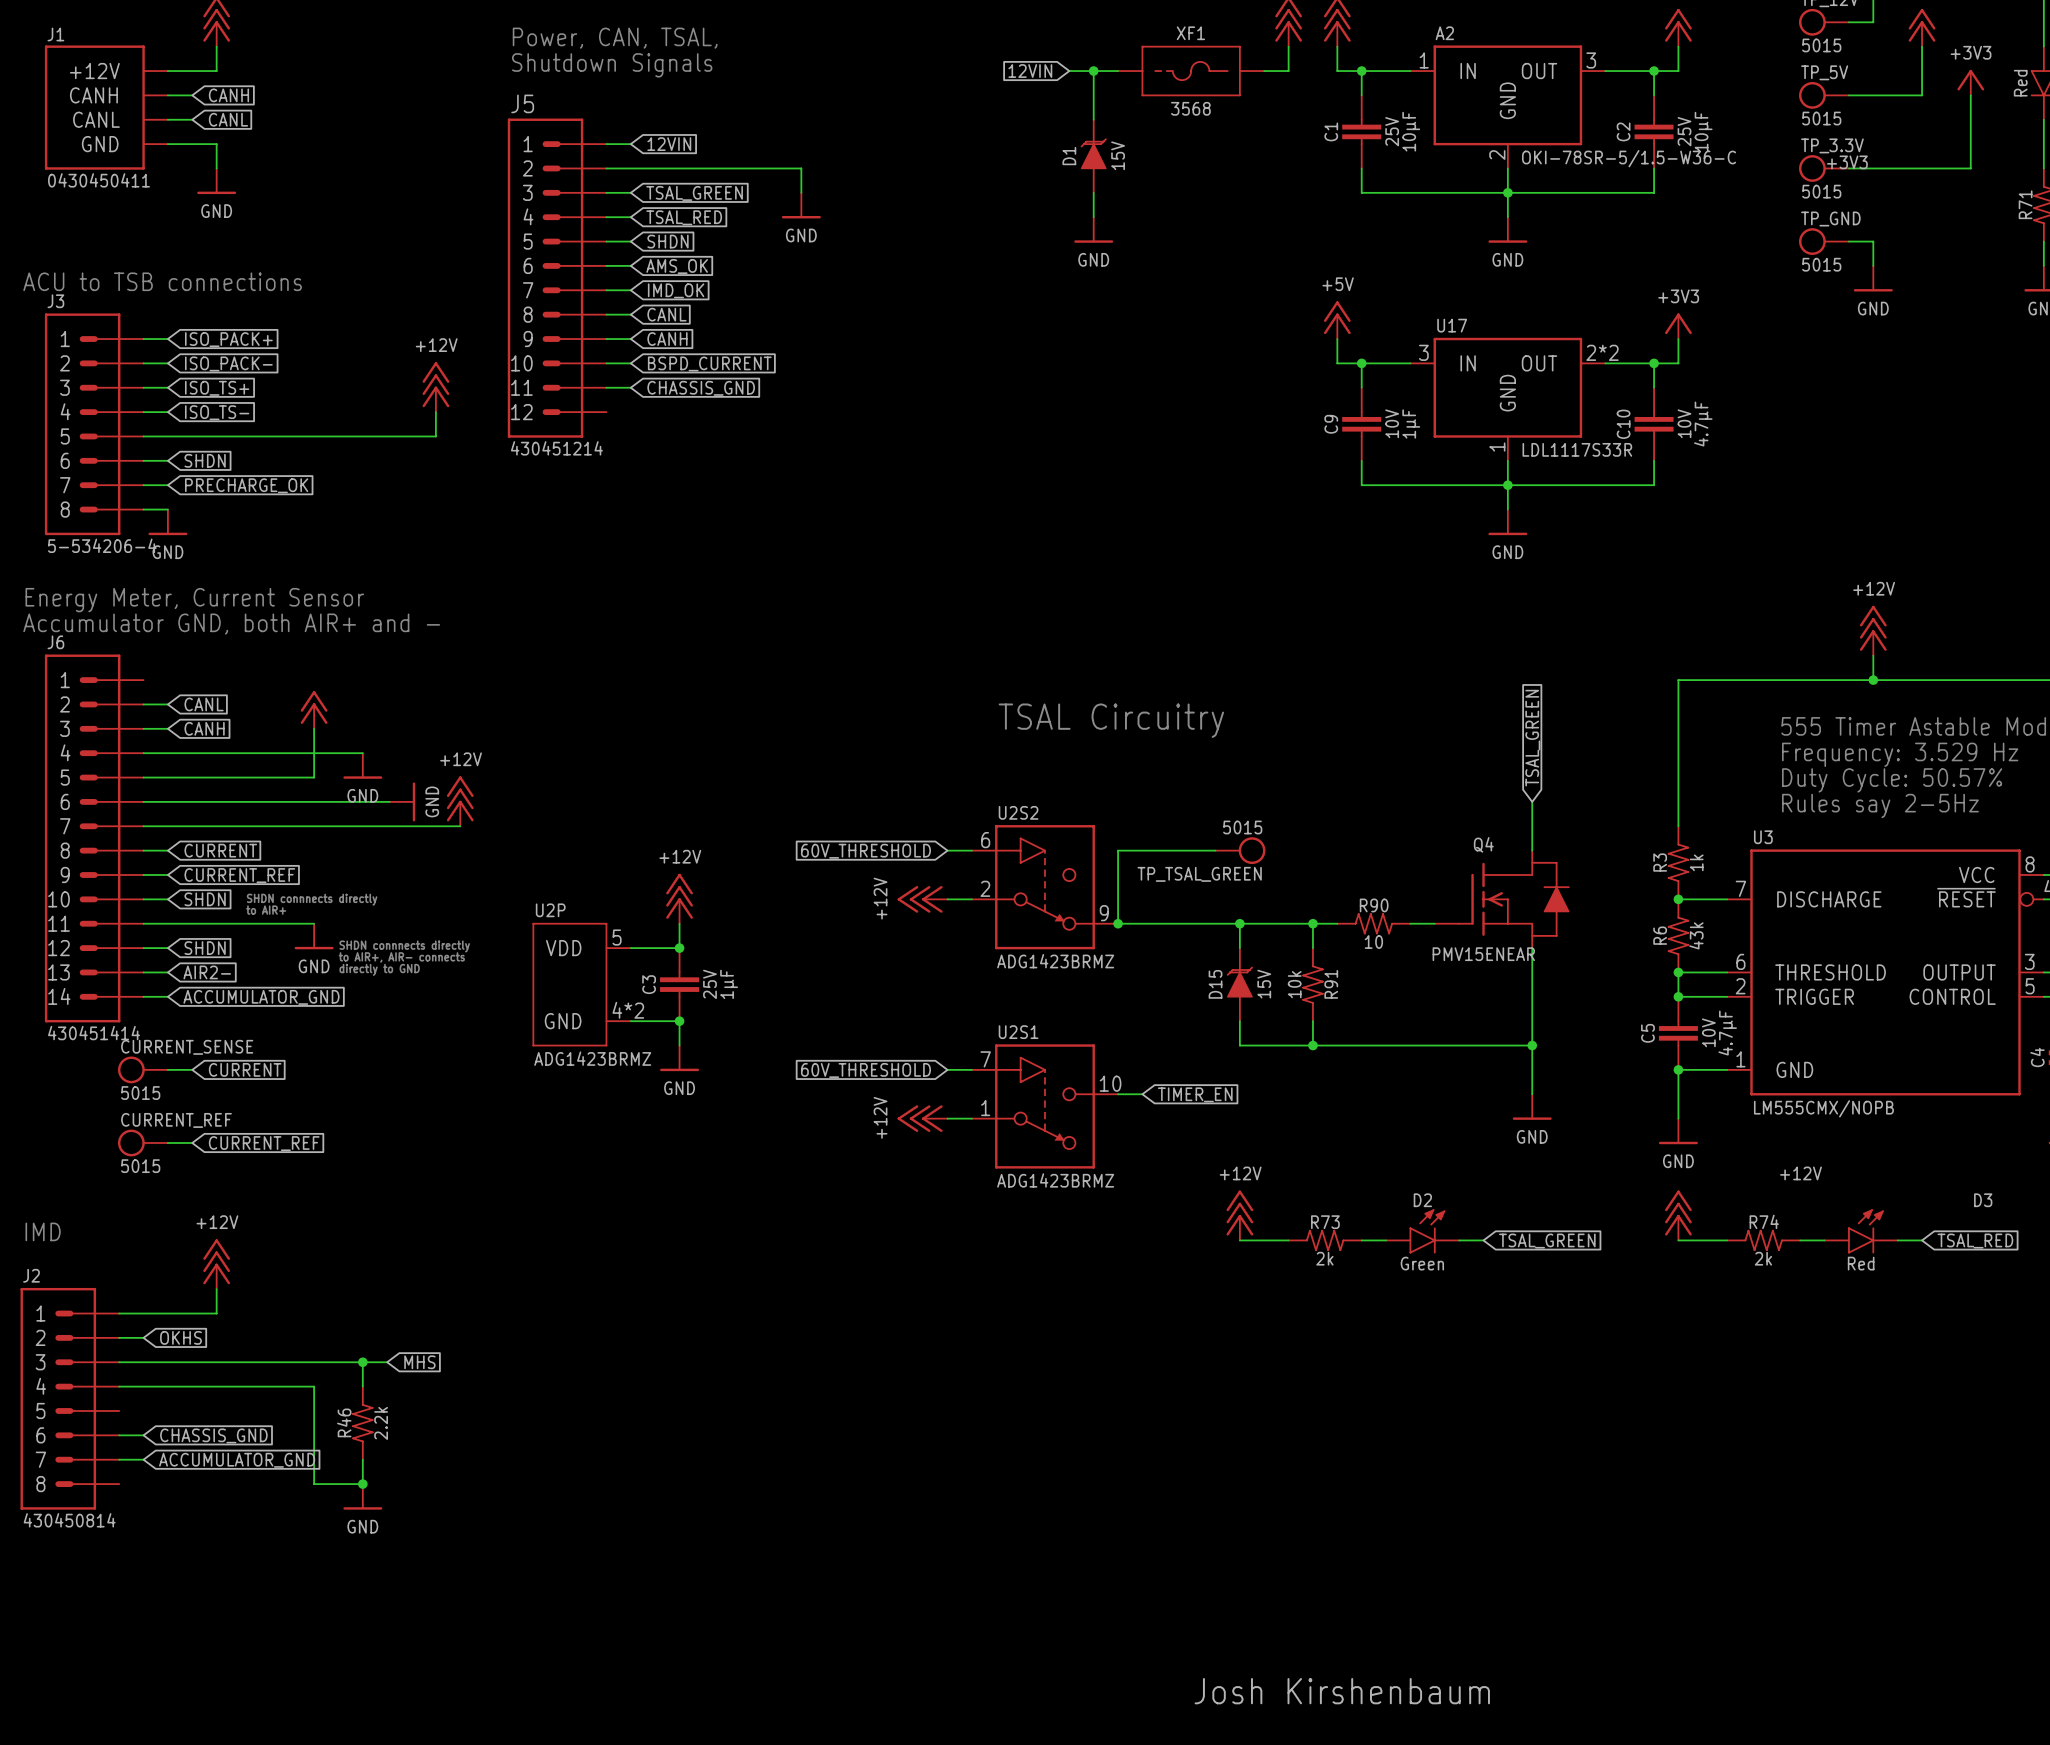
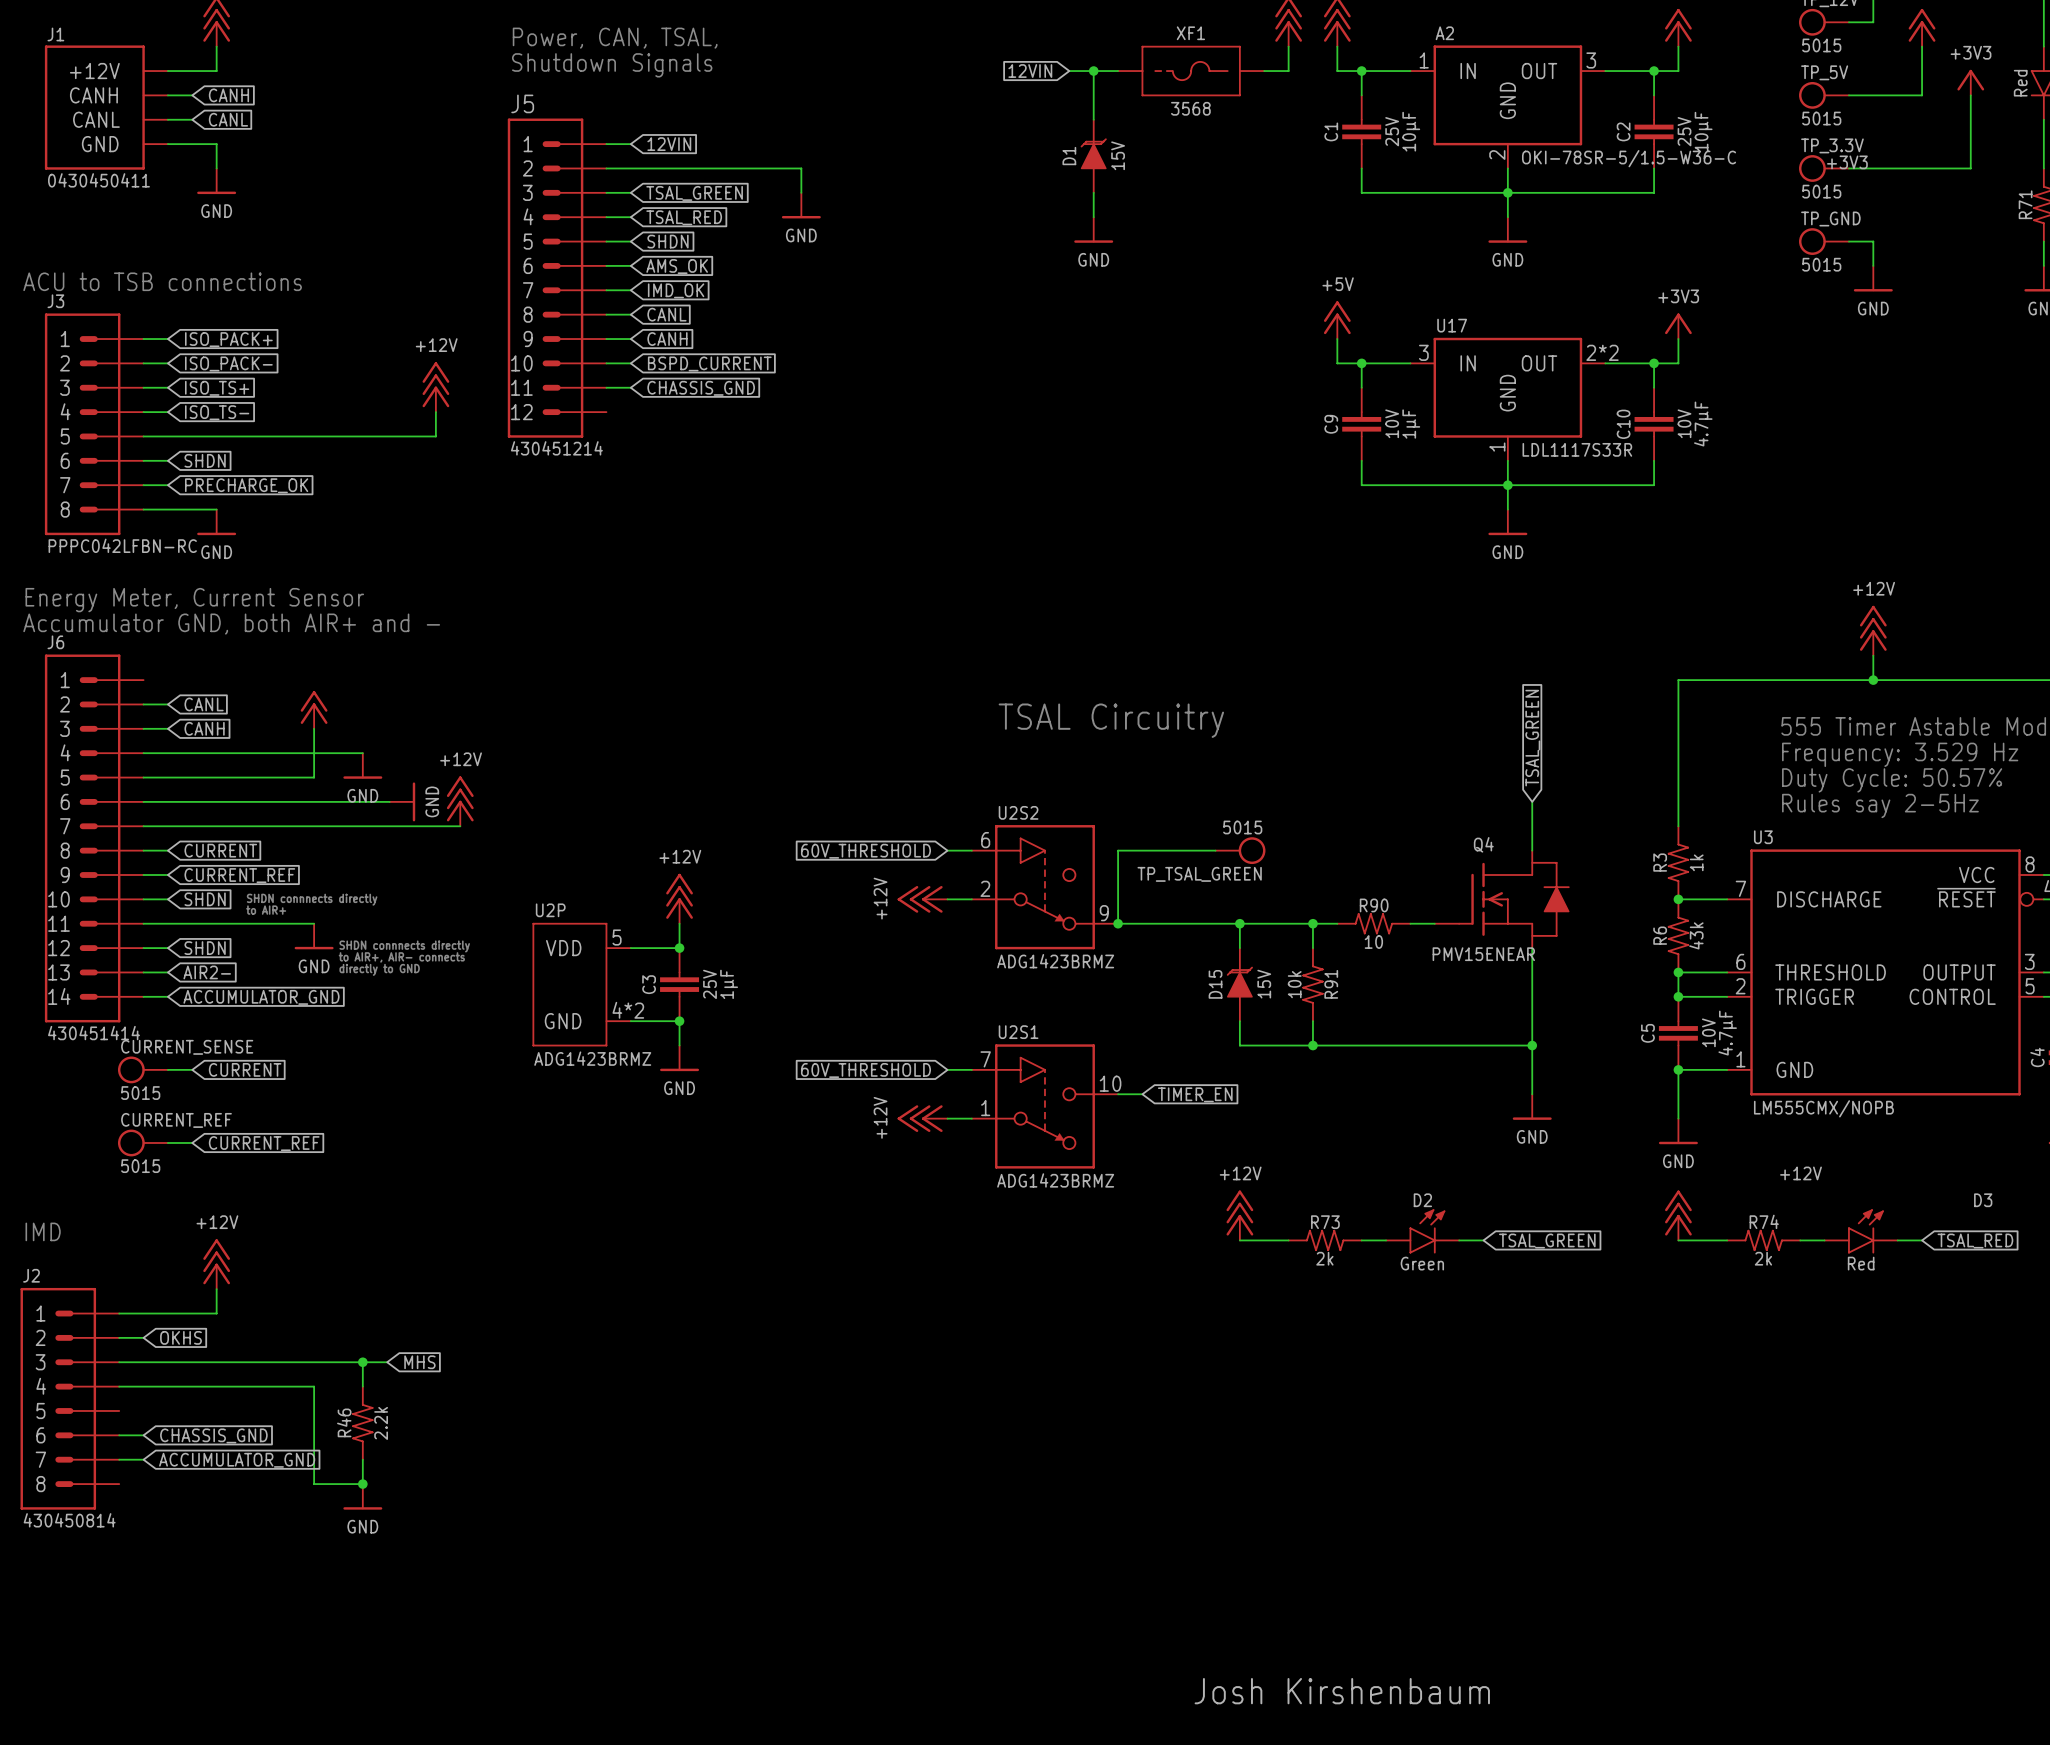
wire: none -> (167, 509) (216, 509)
power symbol position: GND (167, 522) -> GND (216, 522)
J3 text: 5-534206-4 (102, 545) -> PPPC042LFBN-RC (122, 545)

